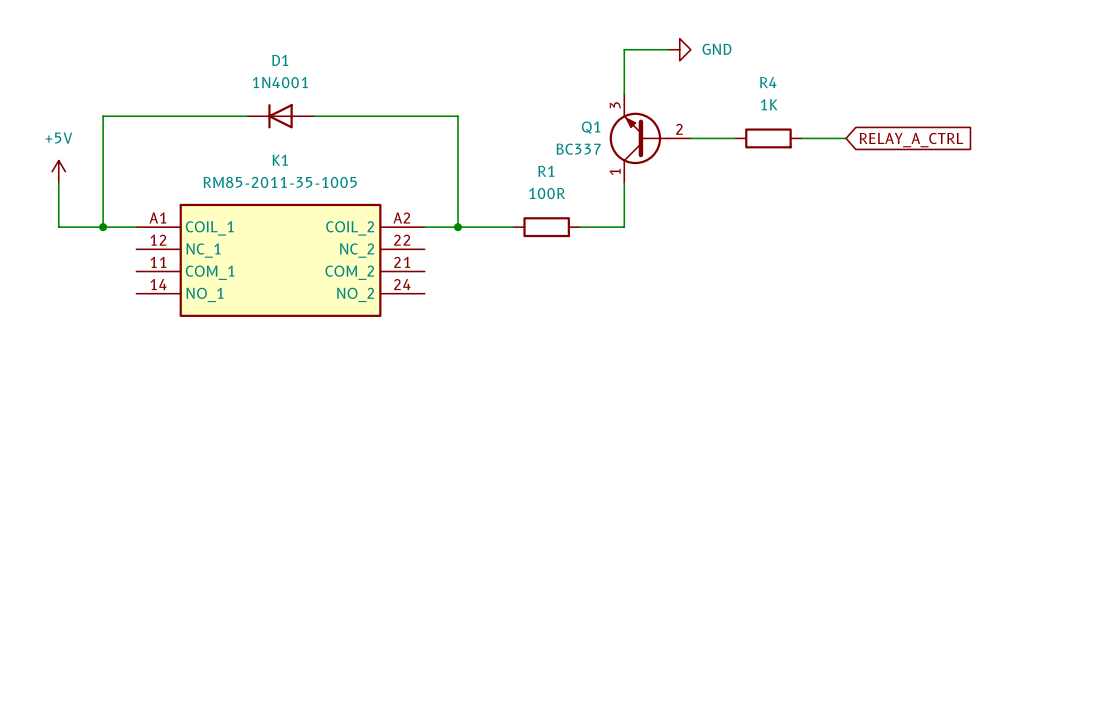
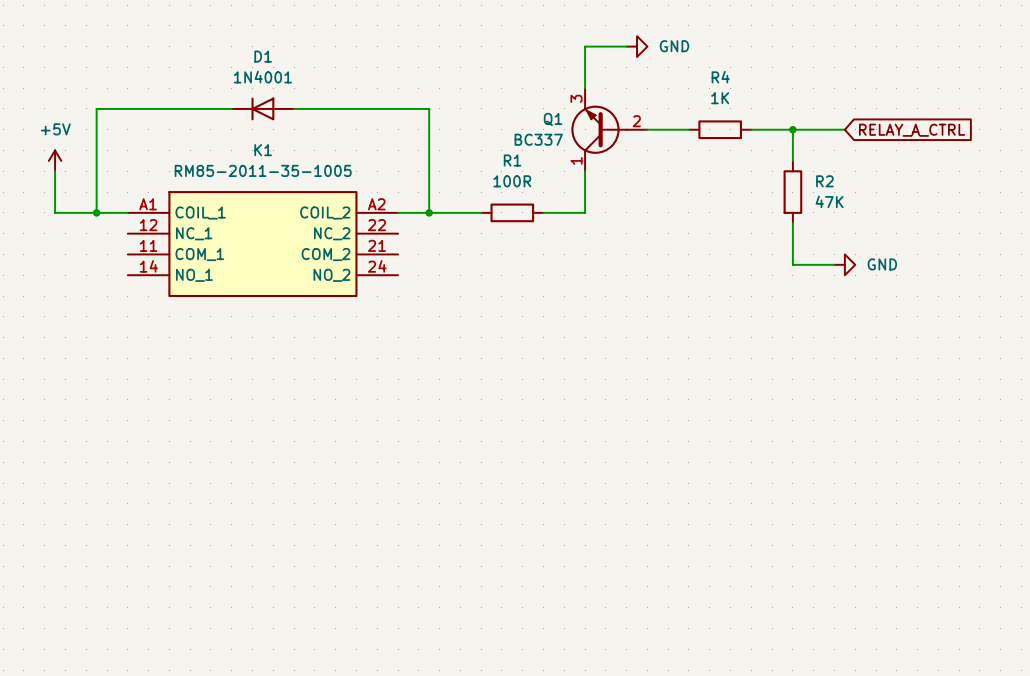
junction: none -> (792, 129)
wire: none -> (844, 129) (792, 129) (792, 160)
global label position: RELAY_A_CTRL (911, 140) -> RELAY_A_CTRL (912, 130)
R2: none -> 47K (792, 192)
wire: none -> (792, 223) (792, 264) (834, 264)
power symbol: none -> GND (844, 264)

